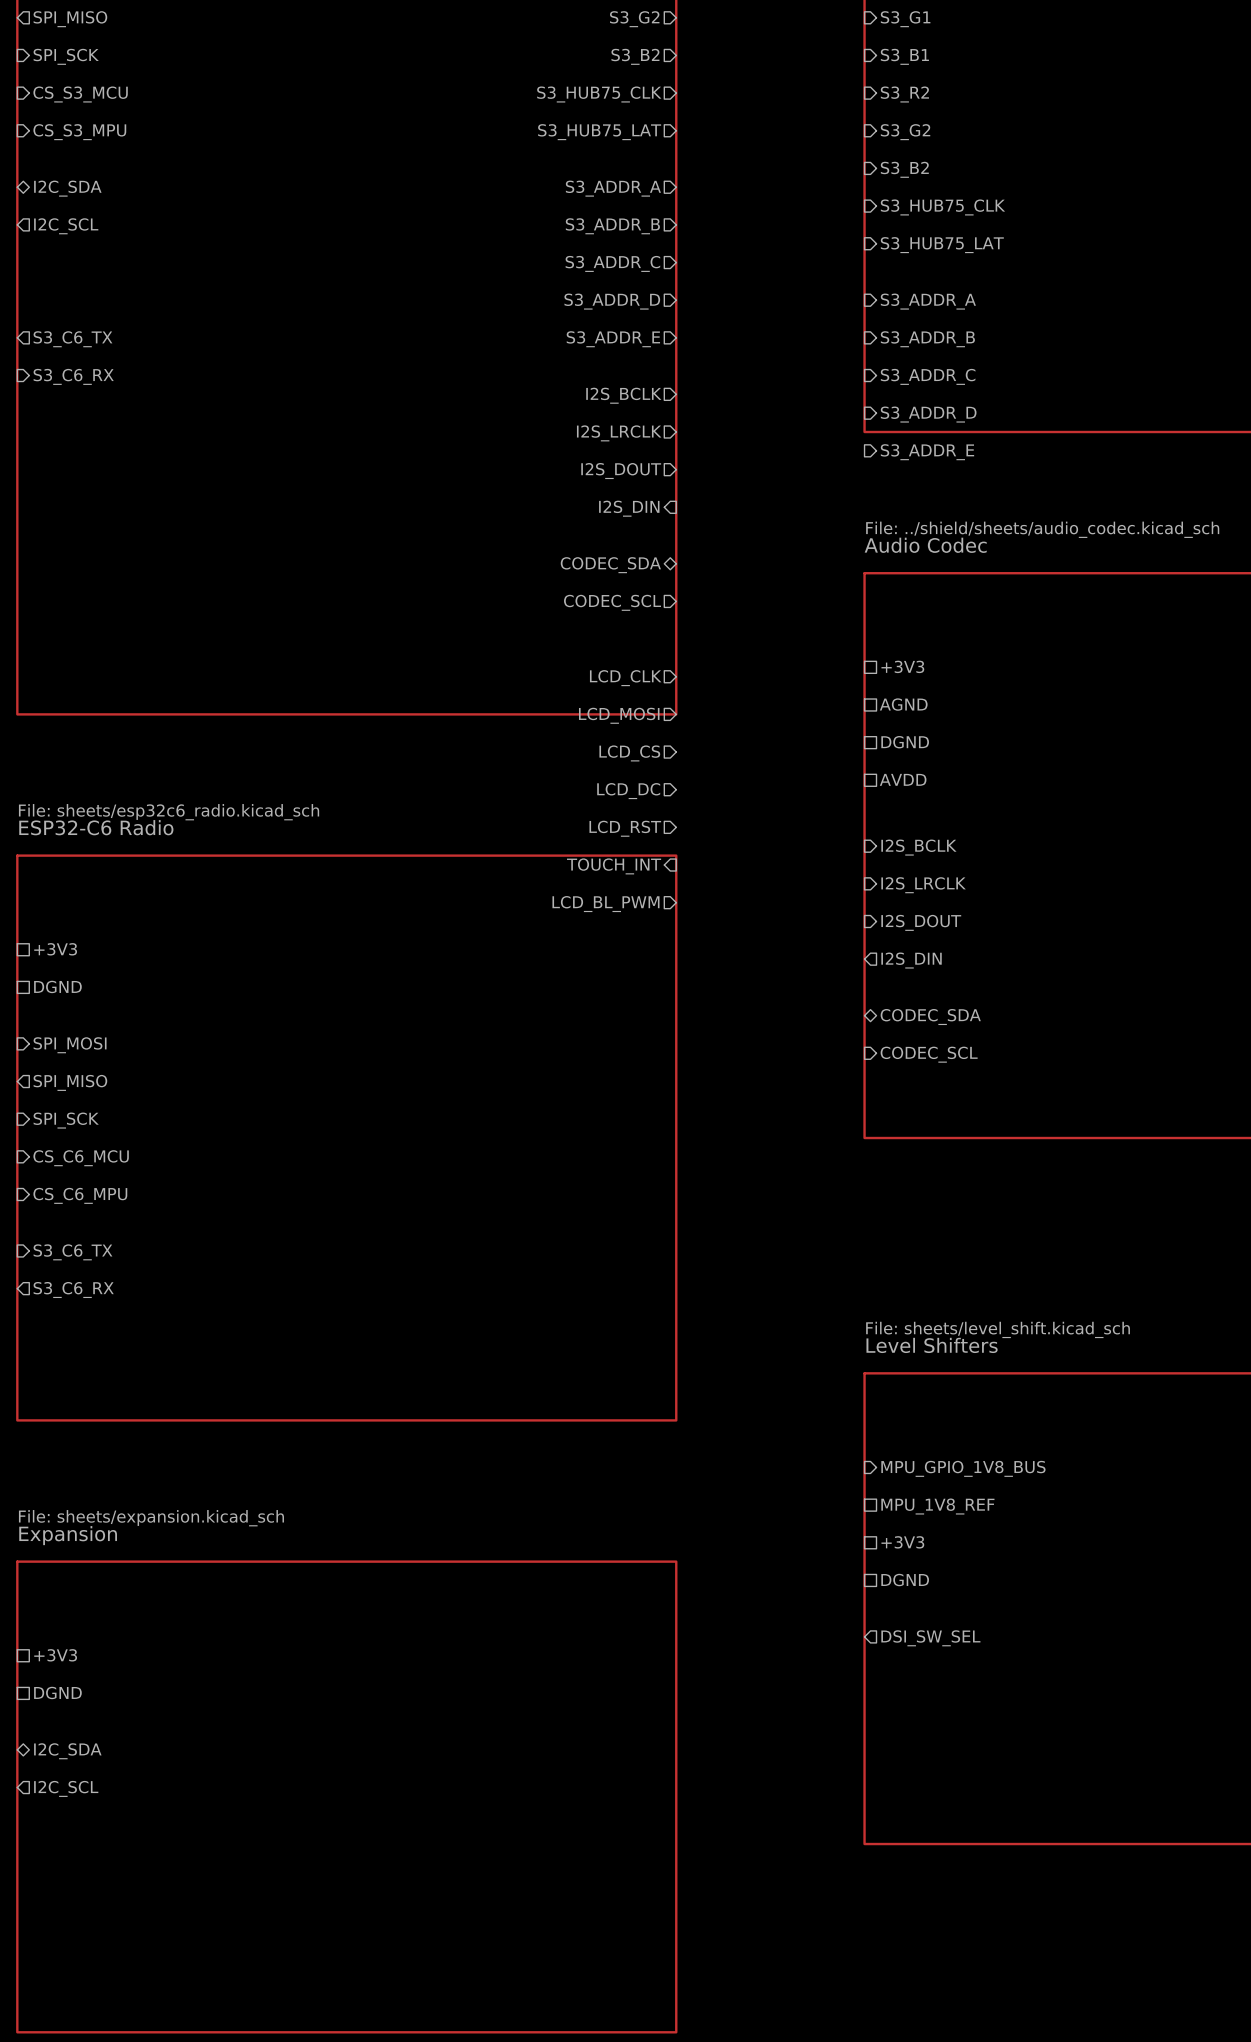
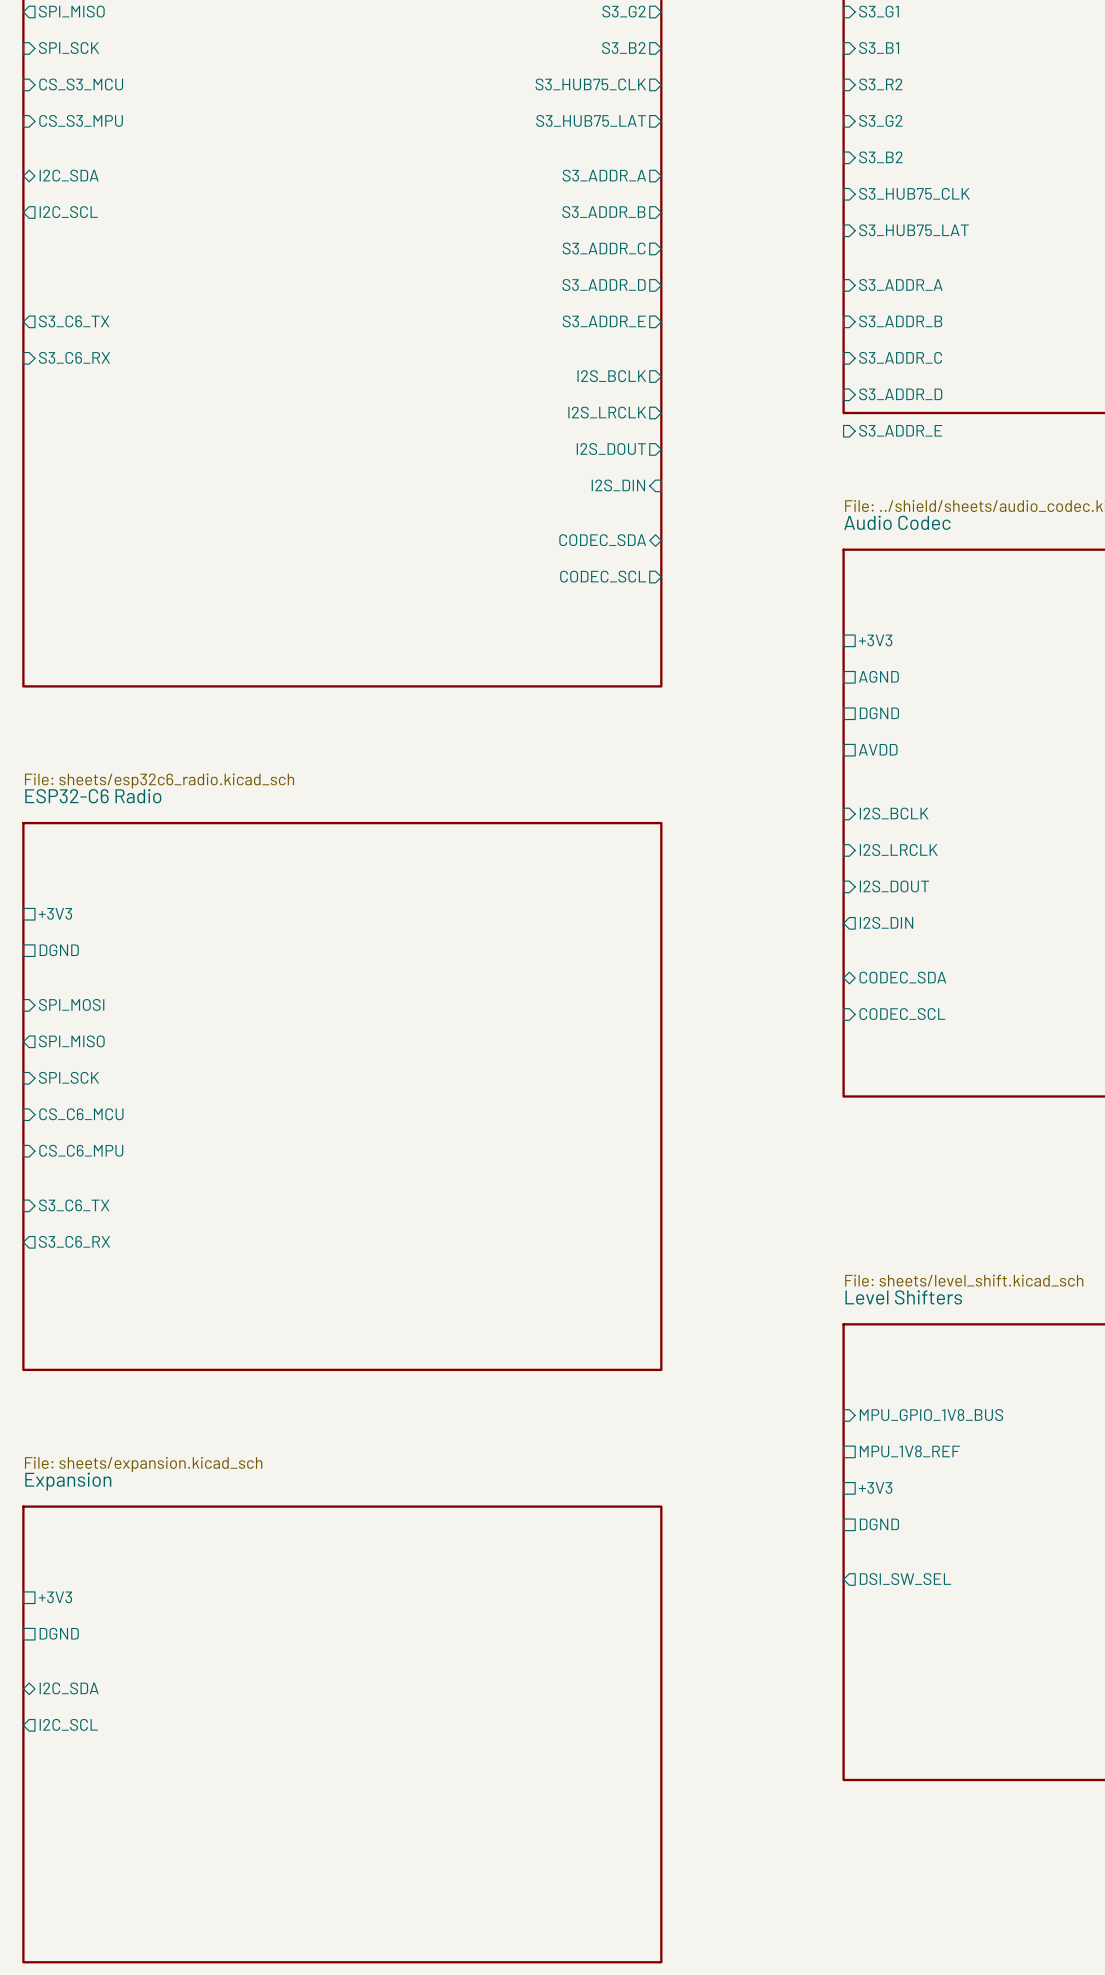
sheet pin: LCD_CLK (625, 678) -> none
sheet pin: LCD_MOSI (619, 715) -> none
sheet pin: LCD_CS (629, 753) -> none
sheet pin: LCD_DC (628, 791) -> none
sheet pin: LCD_RST (625, 828) -> none
sheet pin: TOUCH_INT (614, 866) -> none
sheet pin: LCD_BL_PWM (605, 904) -> none

